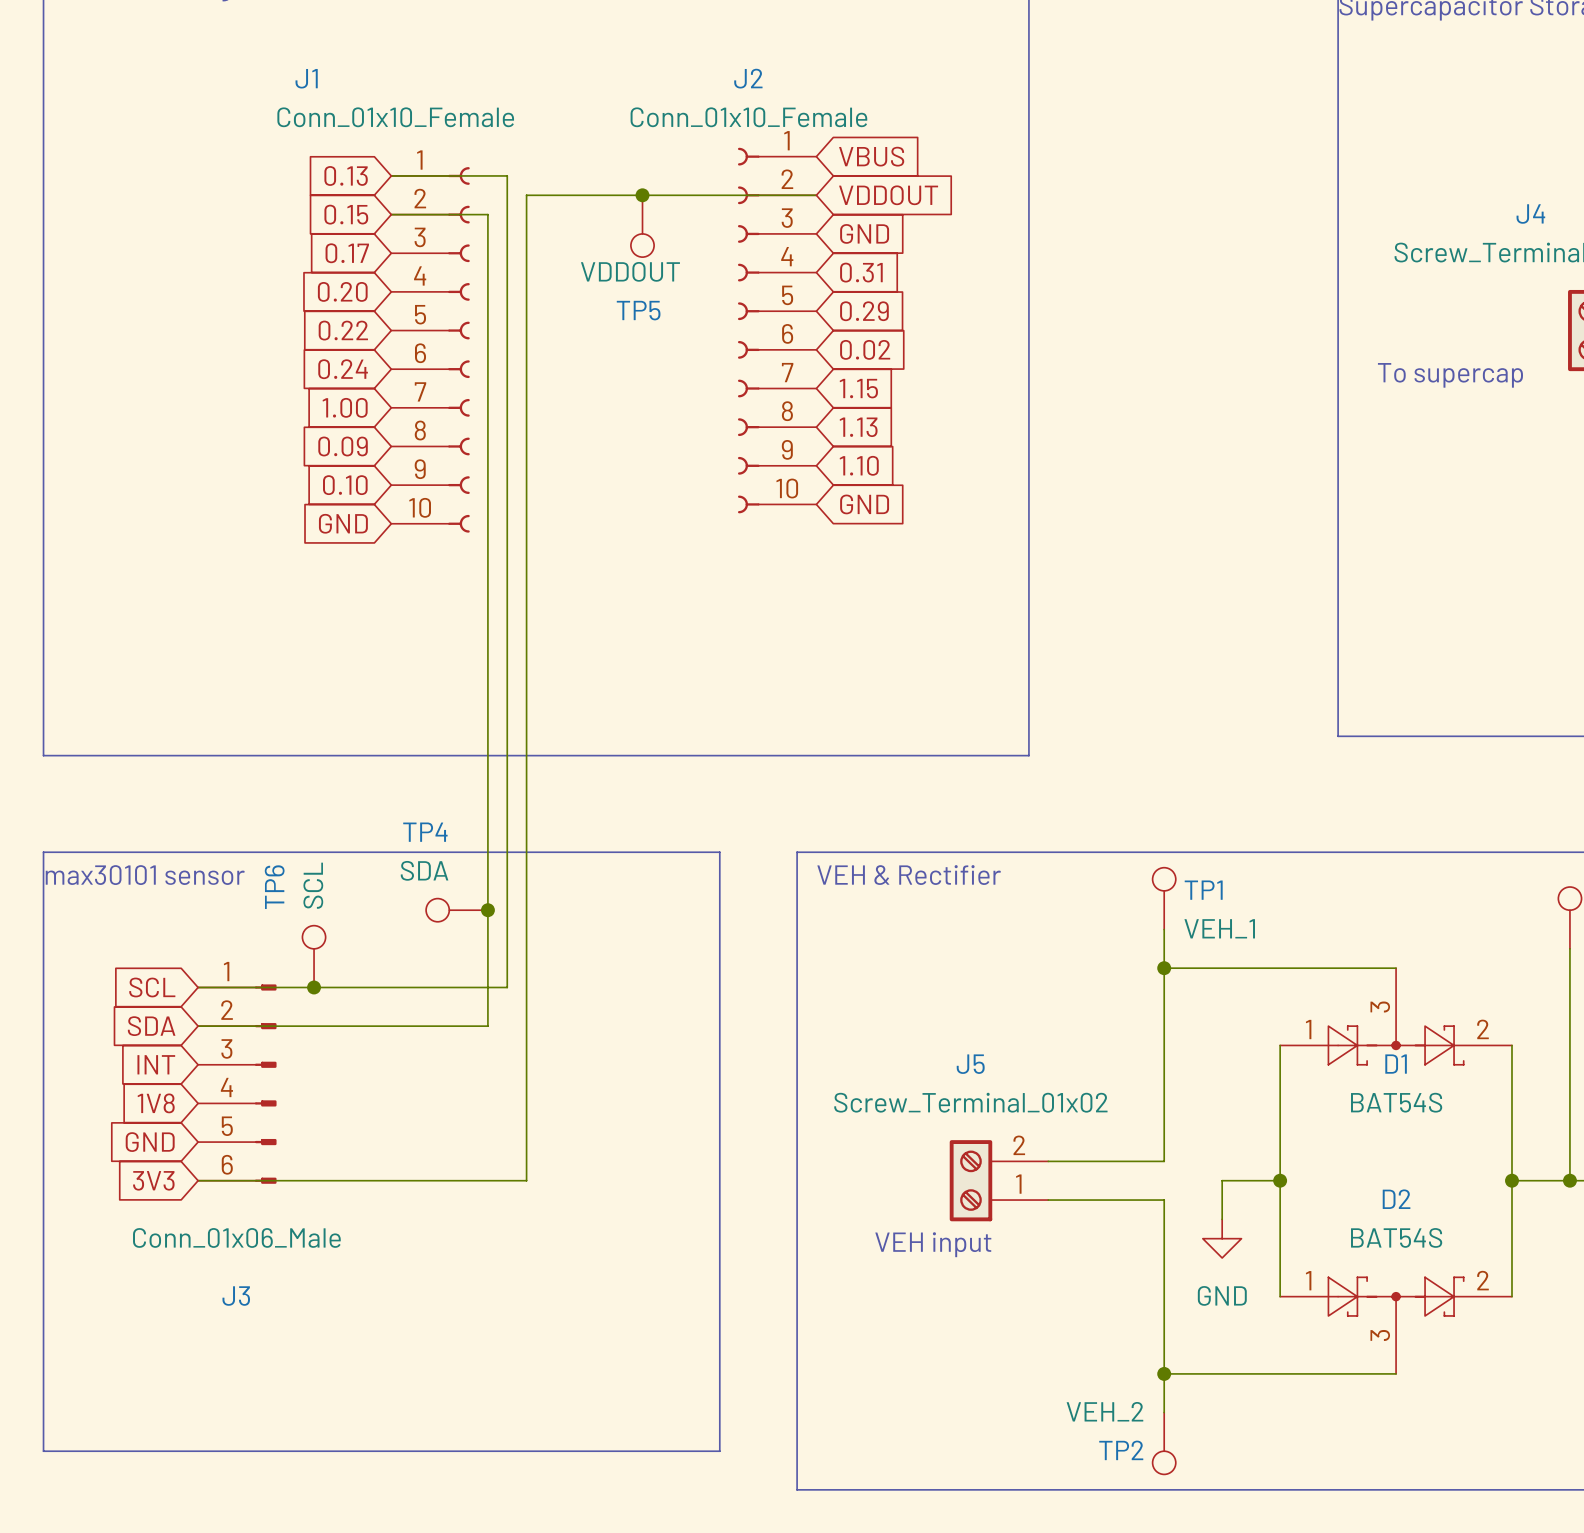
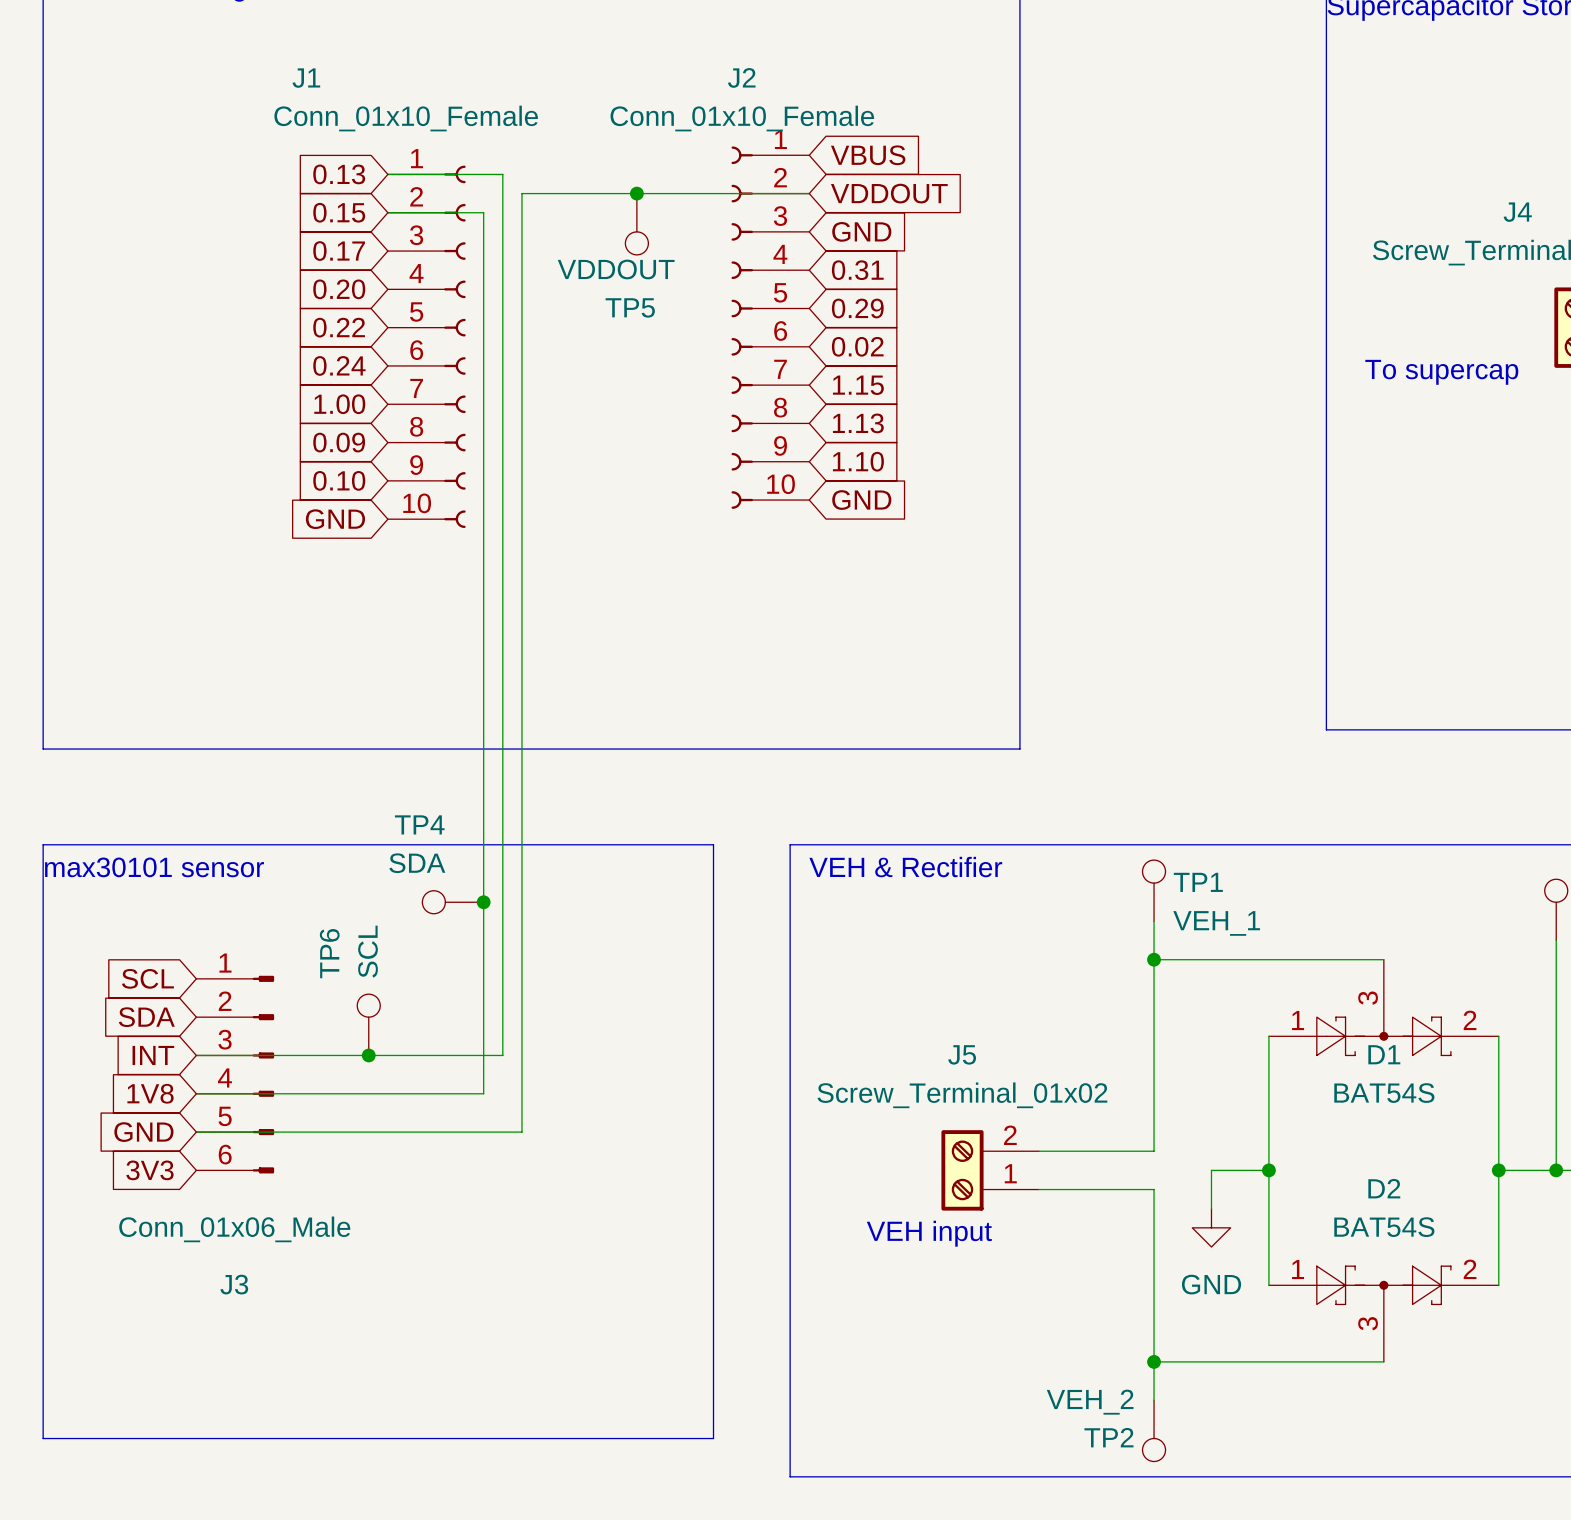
TP6 position: (314, 956) -> (368, 1024)
wire: (198, 987) (507, 987) -> (196, 1055) (502, 1055) (502, 978)
junction: (314, 987) -> none
wire: (198, 1026) (487, 1026) -> (196, 1093) (483, 1093) (483, 1017)
junction: none -> (368, 1055)
wire: (526, 1142) (526, 1180) (198, 1180) -> (521, 1132) (196, 1132)

